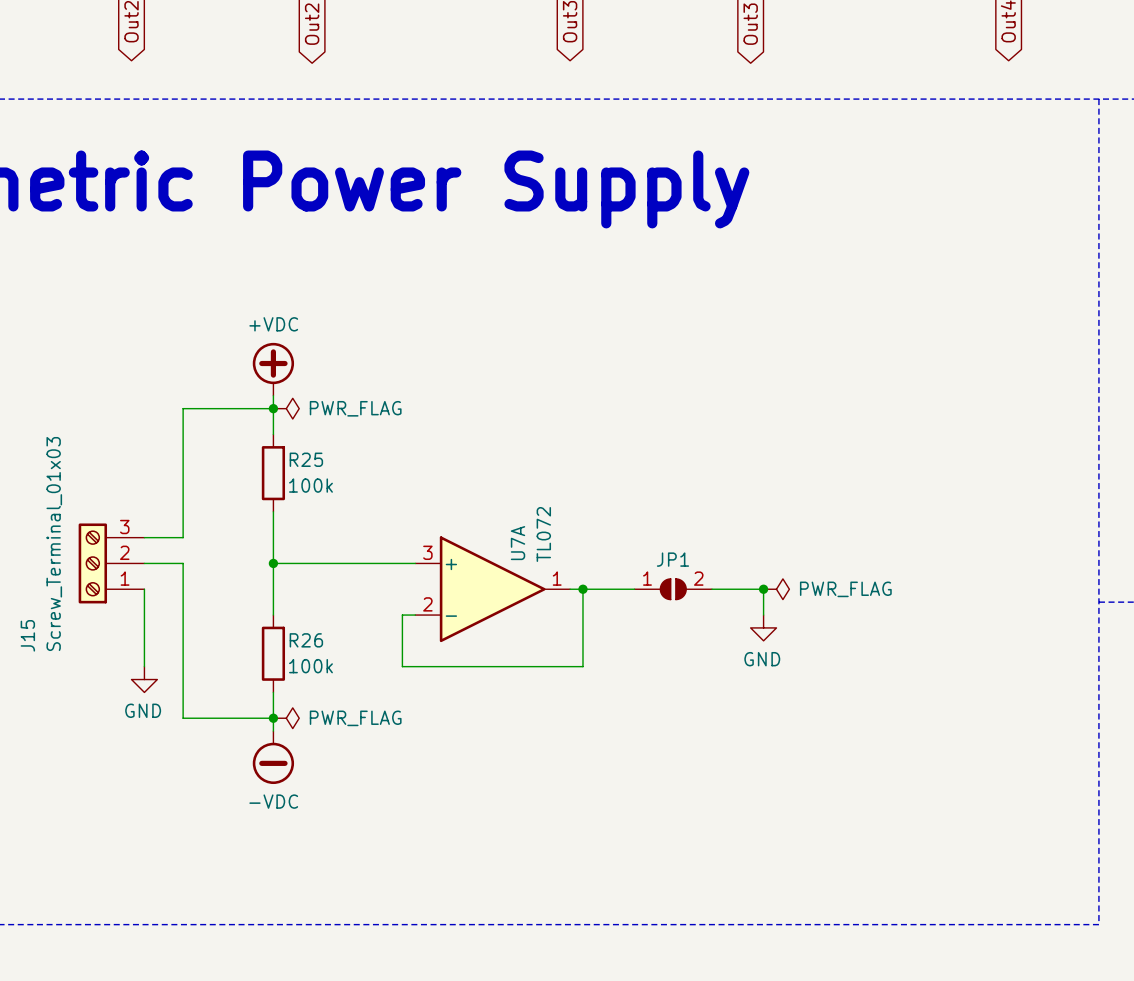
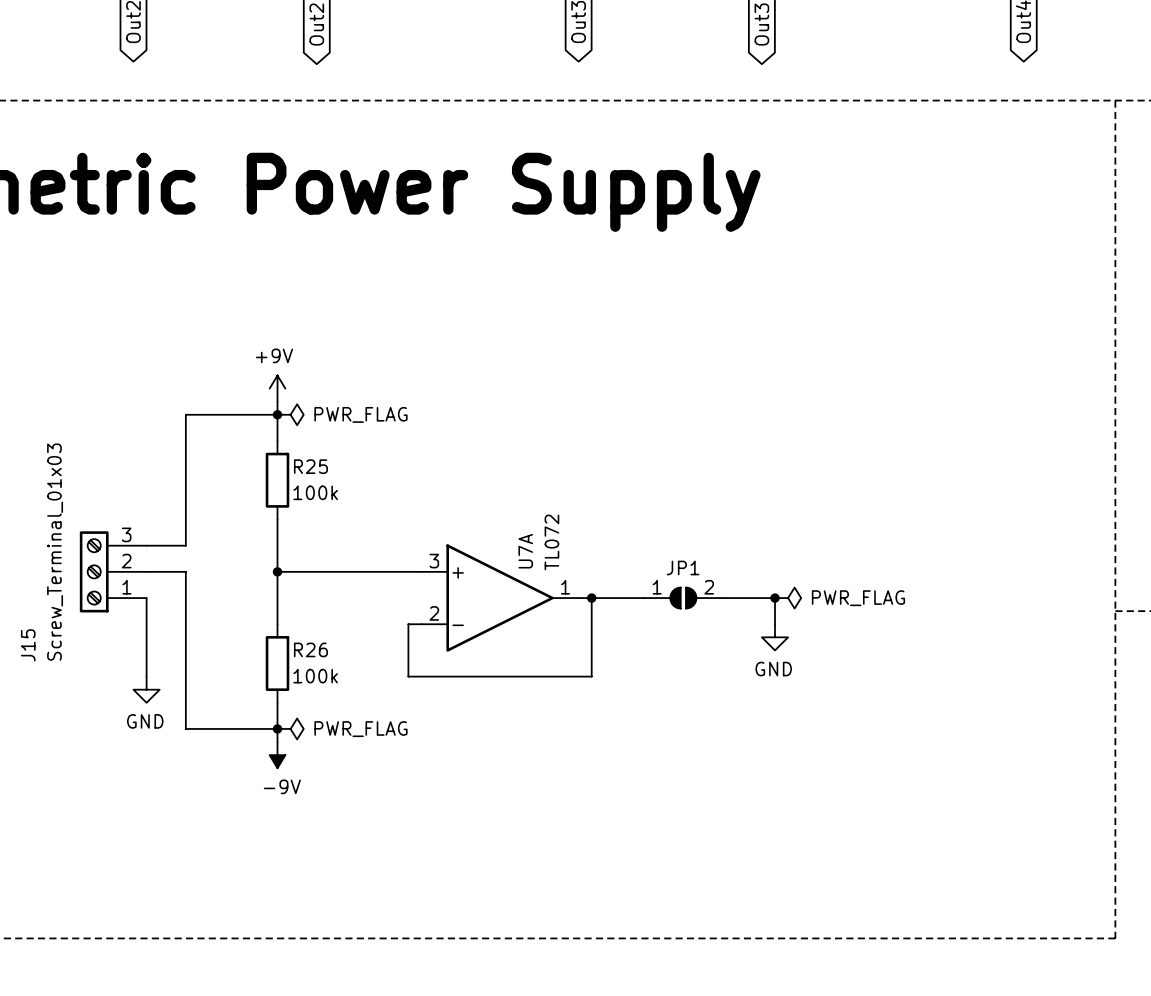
power symbol: +VDC (273, 369) -> none
power symbol: none -> +9V (277, 388)
power symbol: none -> -9V (277, 755)
power symbol: -VDC (273, 757) -> none

